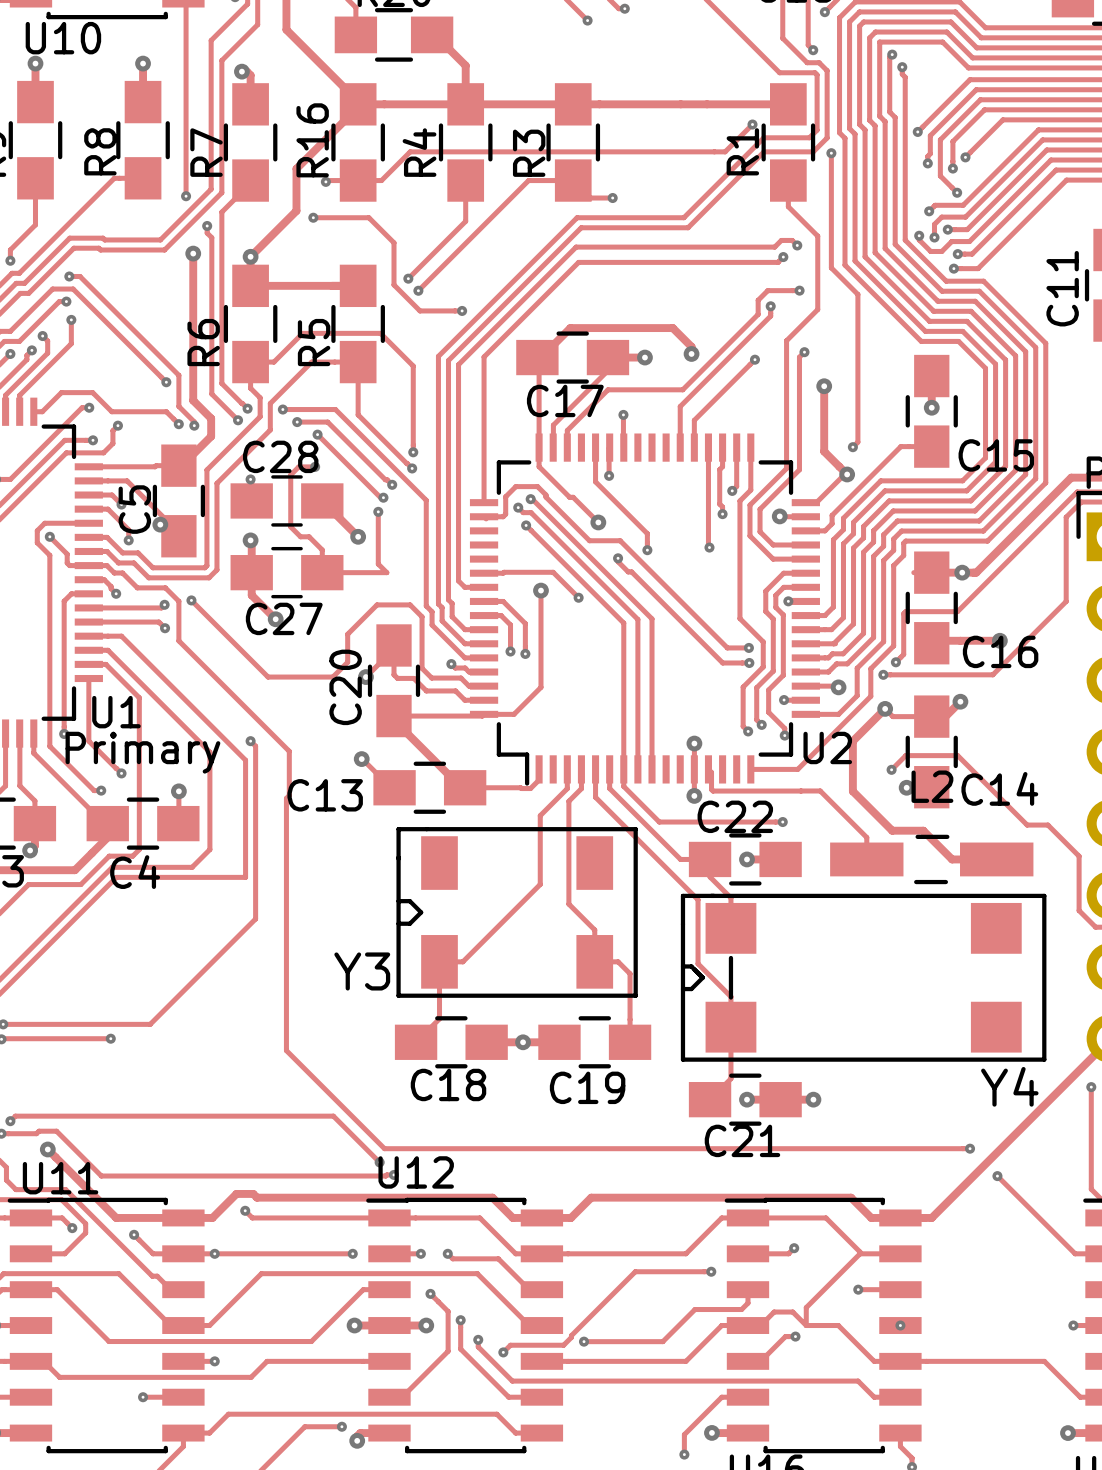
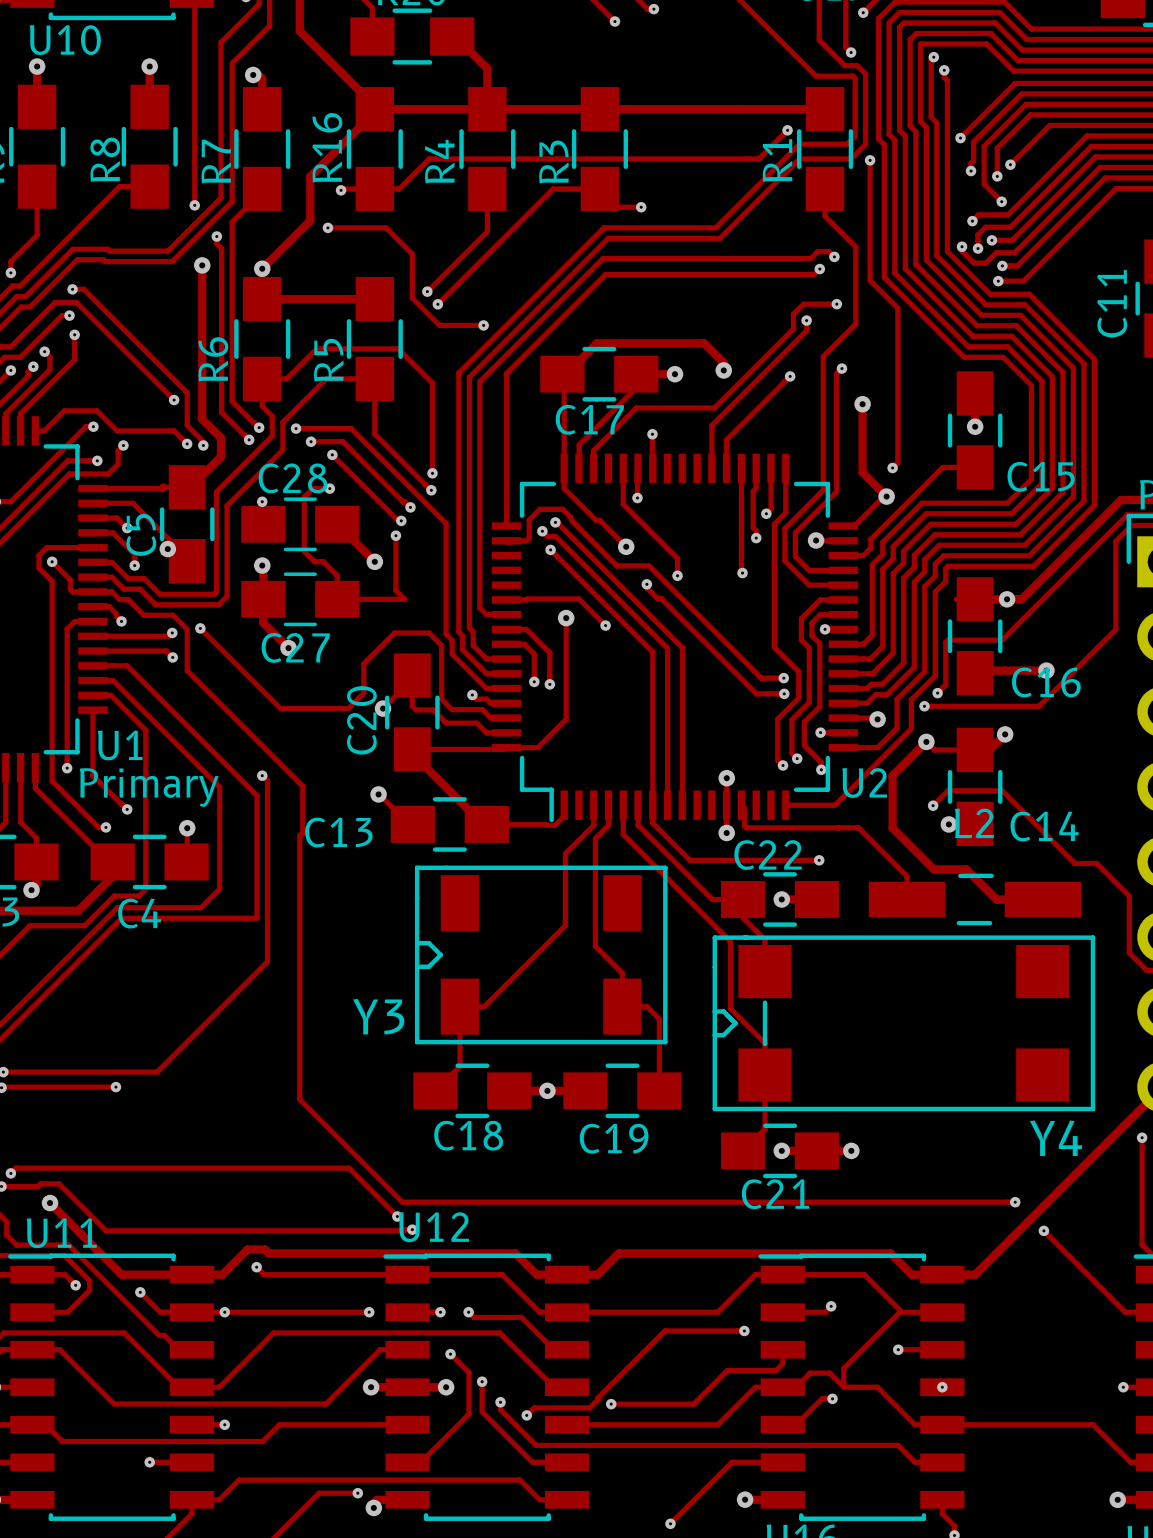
track: (721, 1397) (684, 1434) (684, 1454) -> (755, 1462) (732, 1462) (670, 1523)
via position: (684, 1454) -> (670, 1523)

